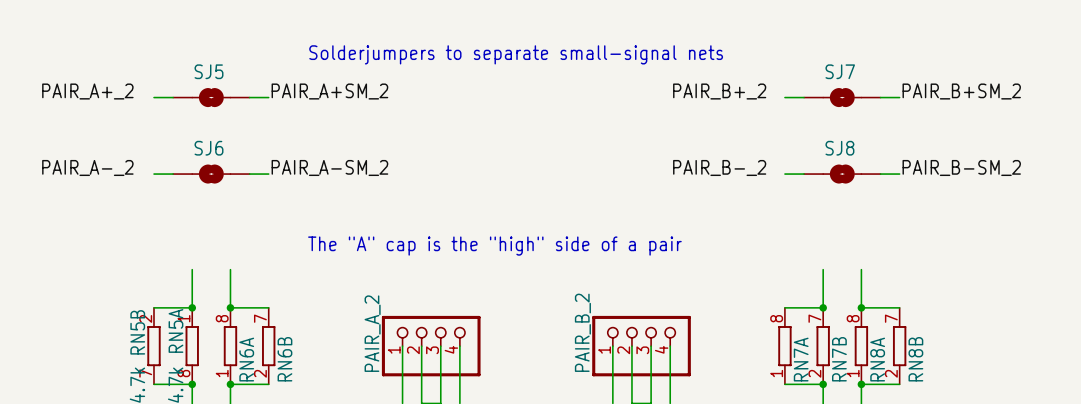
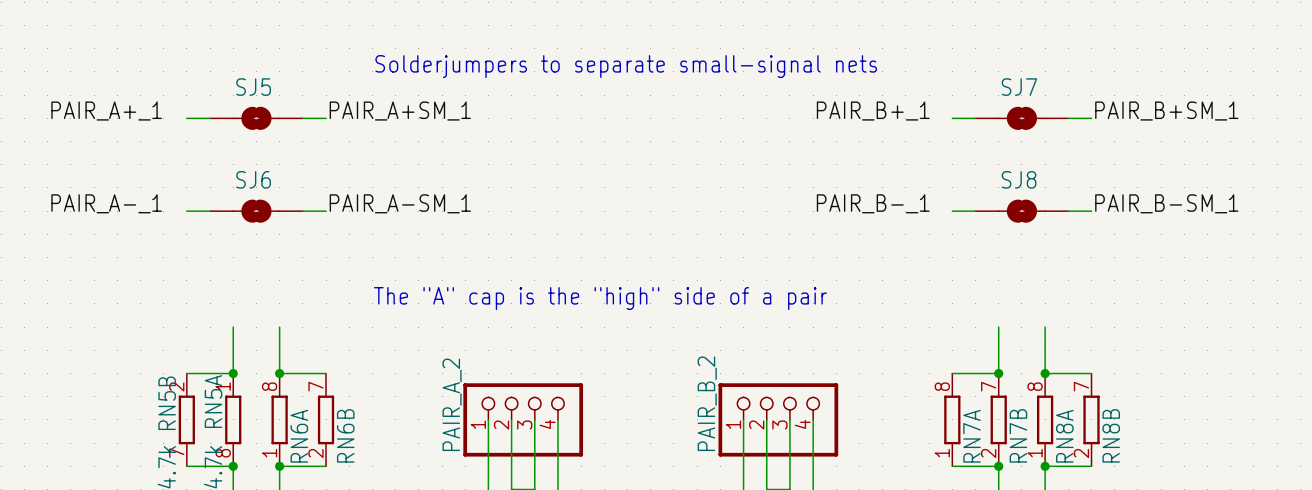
label: PAIR_A+_2 (87, 91) -> PAIR_A+_1 (106, 111)
label: PAIR_A+SM_2 (329, 91) -> PAIR_A+SM_1 (400, 111)
label: PAIR_B+_2 (719, 91) -> PAIR_B+_1 (873, 111)
label: PAIR_B+SM_2 (961, 91) -> PAIR_B+SM_1 (1166, 111)
label: PAIR_A-_2 (87, 167) -> PAIR_A-_1 (106, 203)
label: PAIR_A-SM_2 (329, 167) -> PAIR_A-SM_1 (400, 203)
label: PAIR_B-_2 (719, 167) -> PAIR_B-_1 (873, 203)
label: PAIR_B-SM_2 (961, 167) -> PAIR_B-SM_1 (1166, 203)

